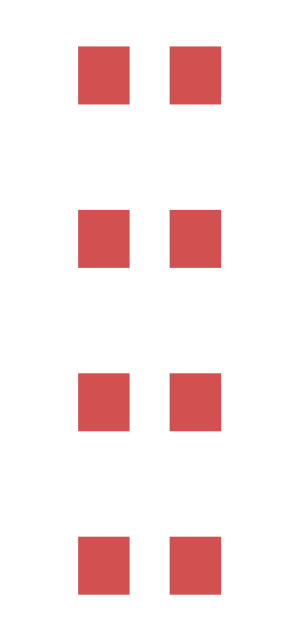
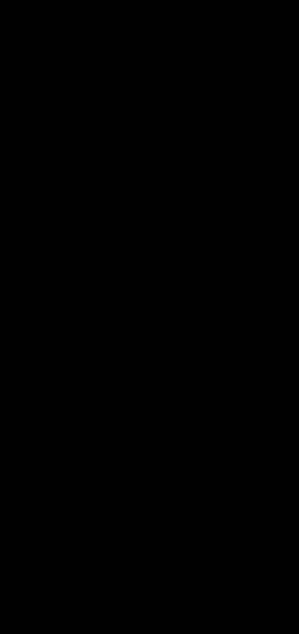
part: (149, 75) -> none
part: (149, 238) -> none
part: (149, 402) -> none
part: (149, 565) -> none

